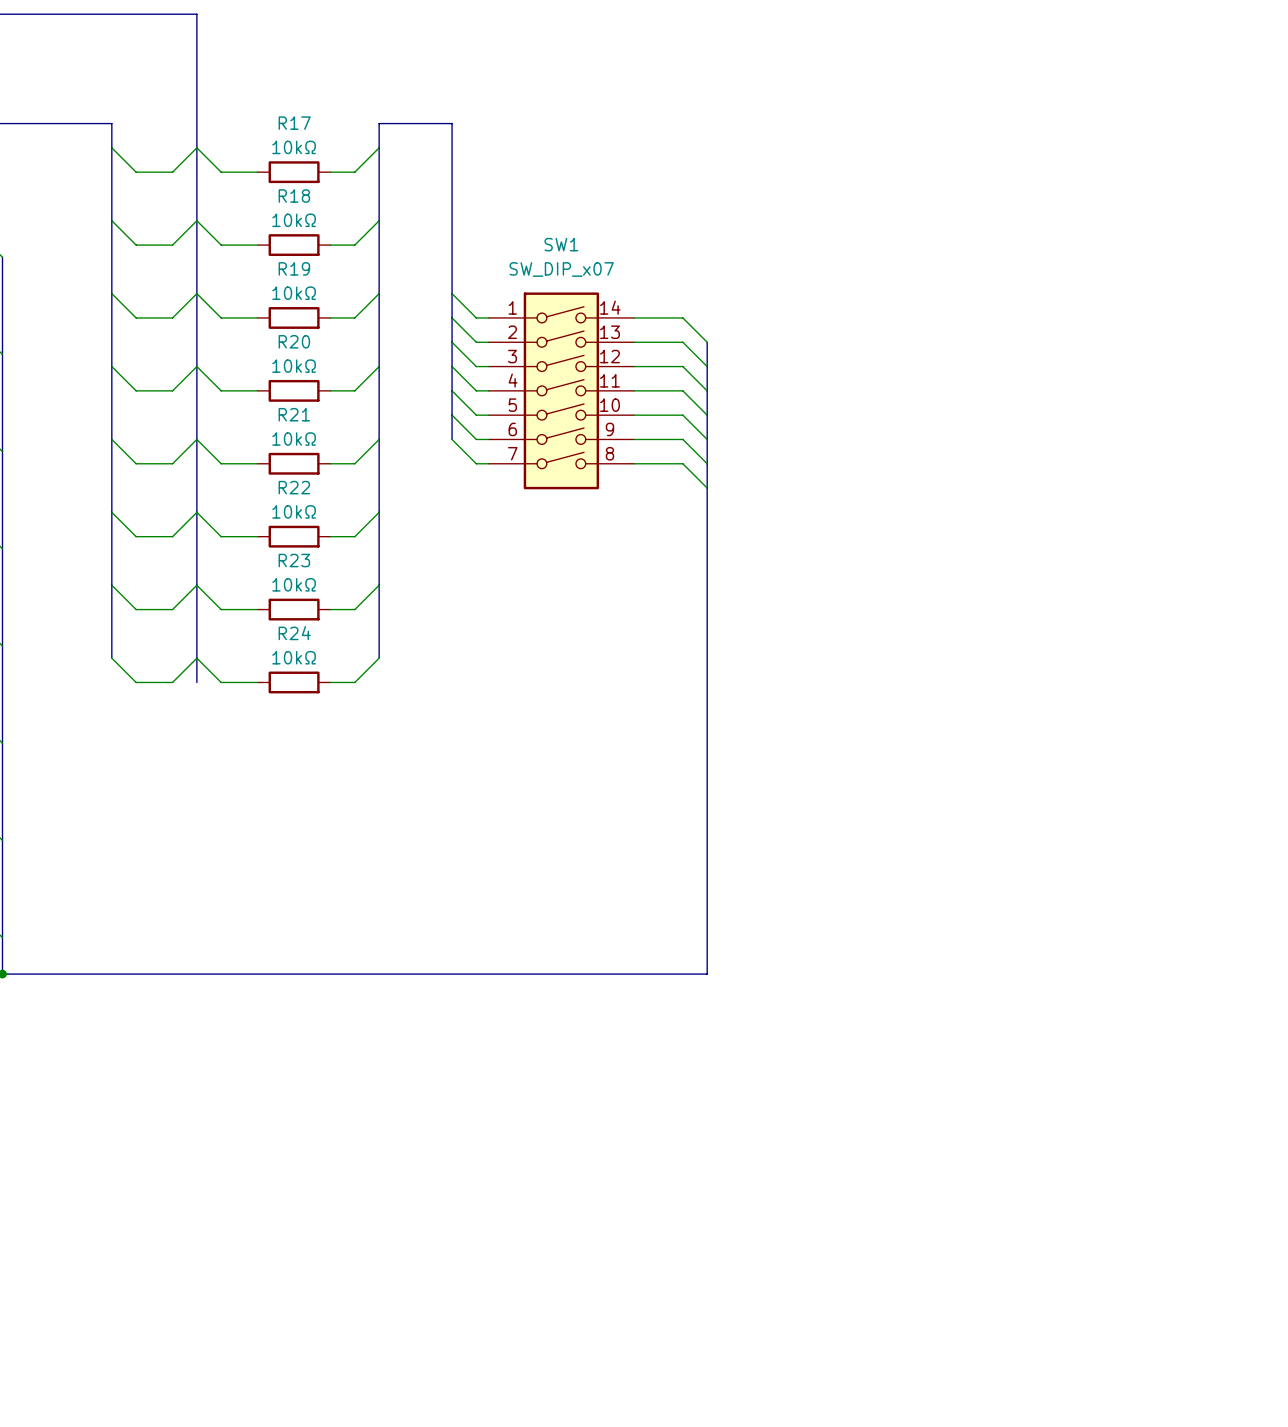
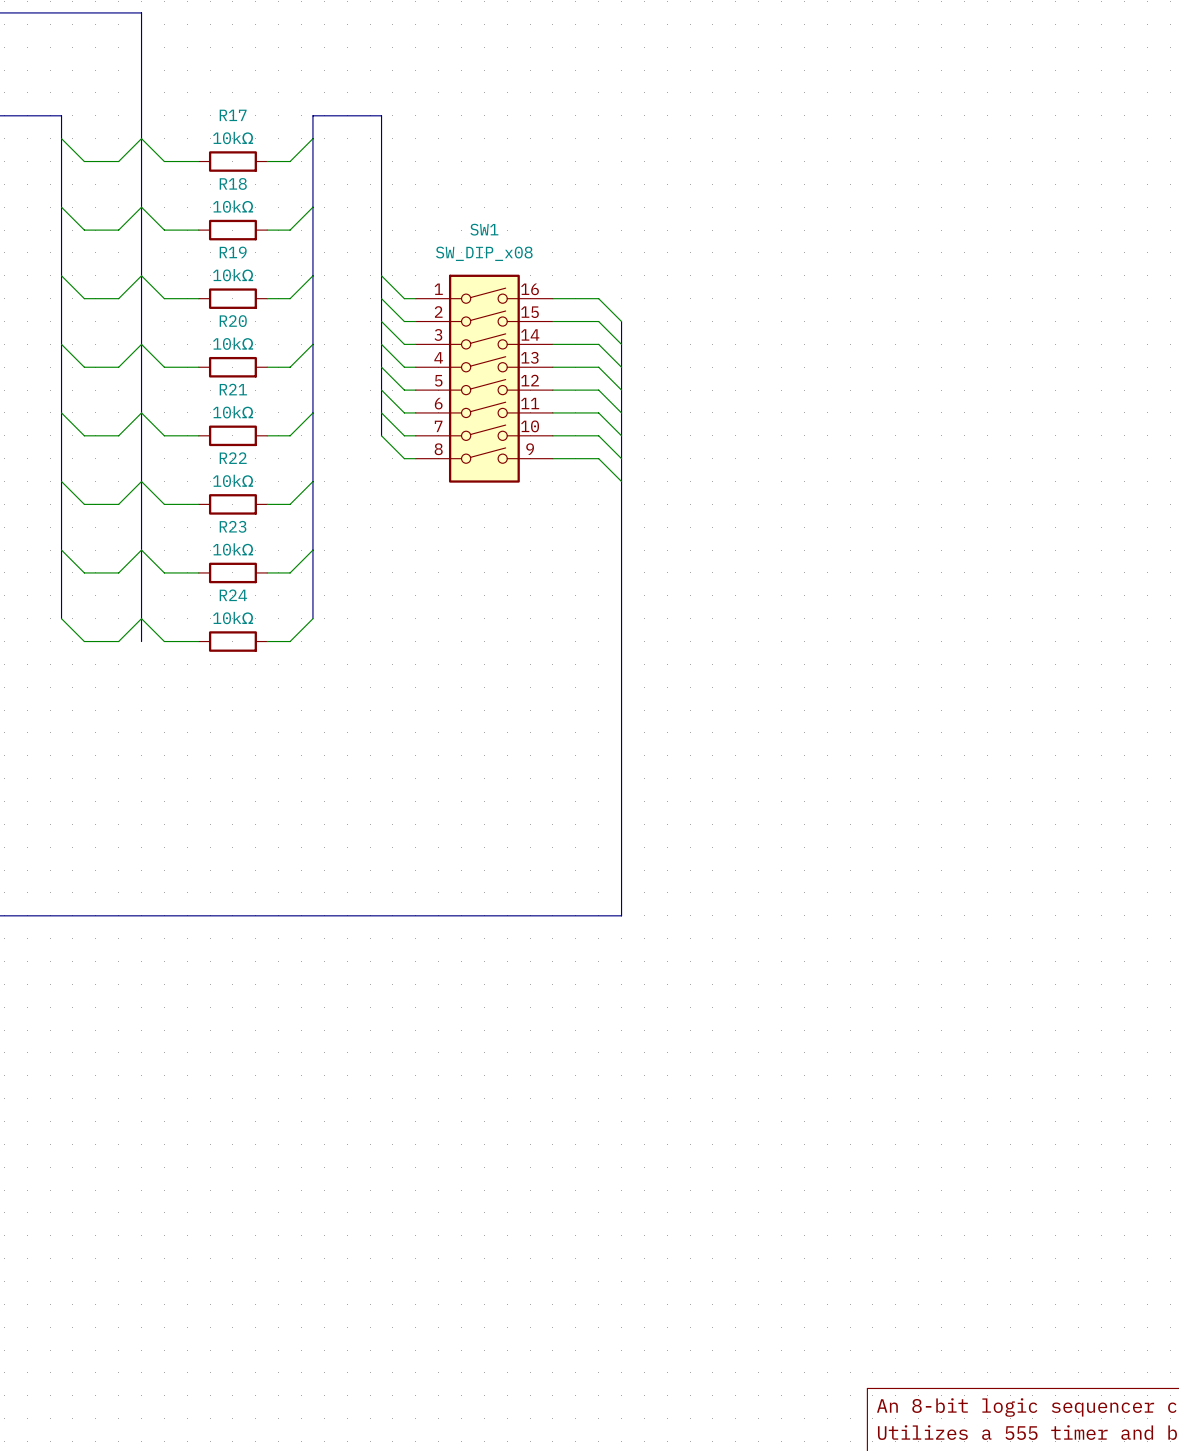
SW1 value: SW_DIP_x07 (561, 269) -> SW_DIP_x08 (484, 253)
SW1 symbol: [488, 292, 635, 490] -> [415, 274, 553, 483]
bus: none -> (381, 412) (381, 435)
wire: none -> (381, 435) (404, 458) (415, 458)
wire: none -> (552, 458) (598, 458) (621, 481)

